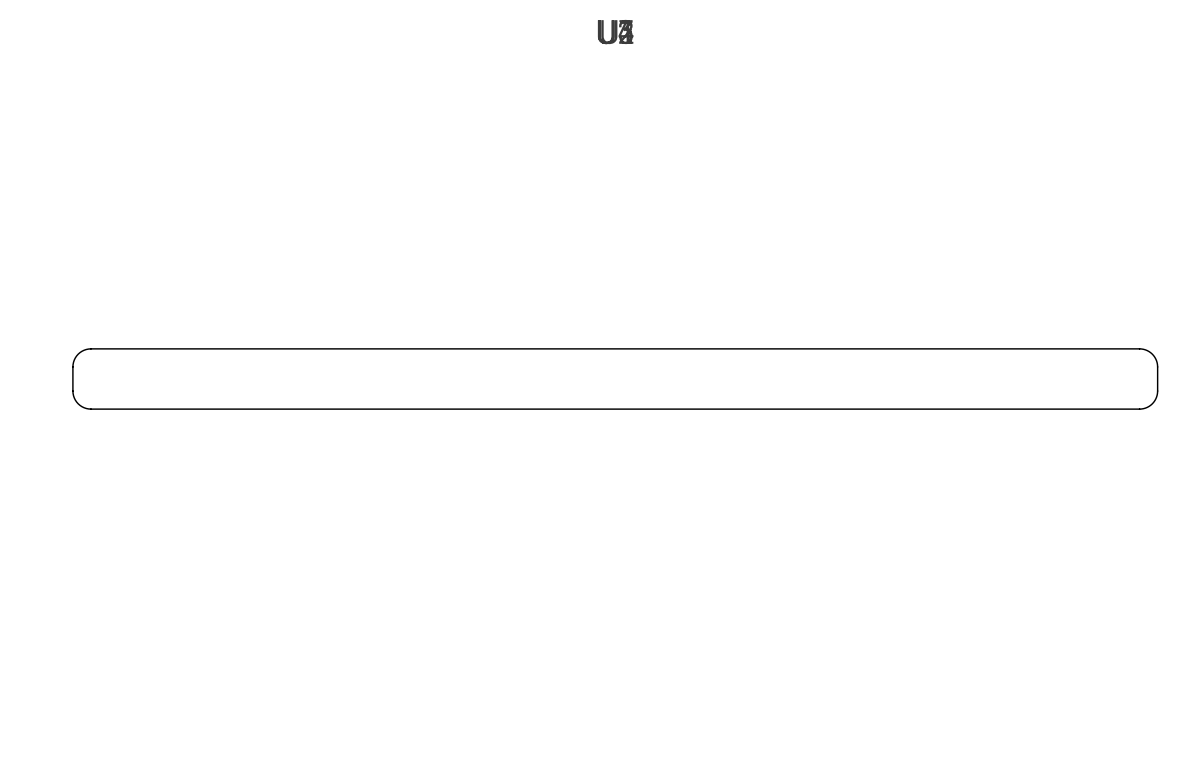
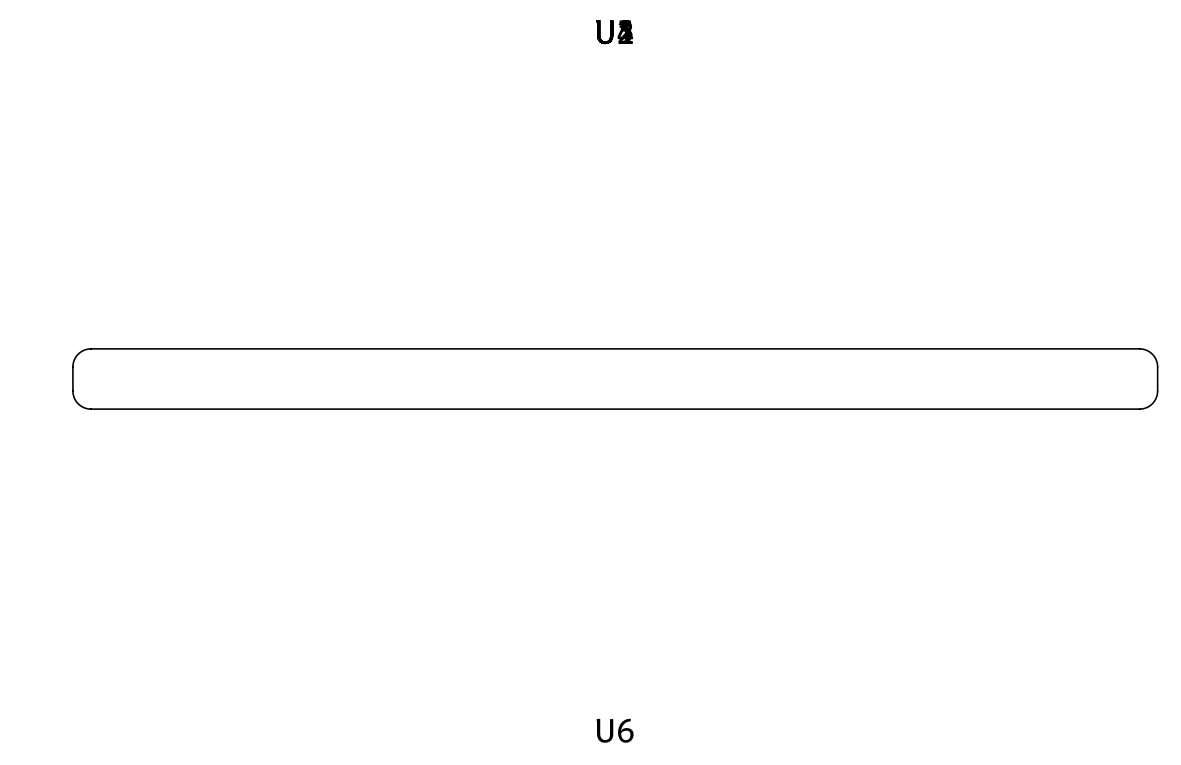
U6: none -> (615, 730)

